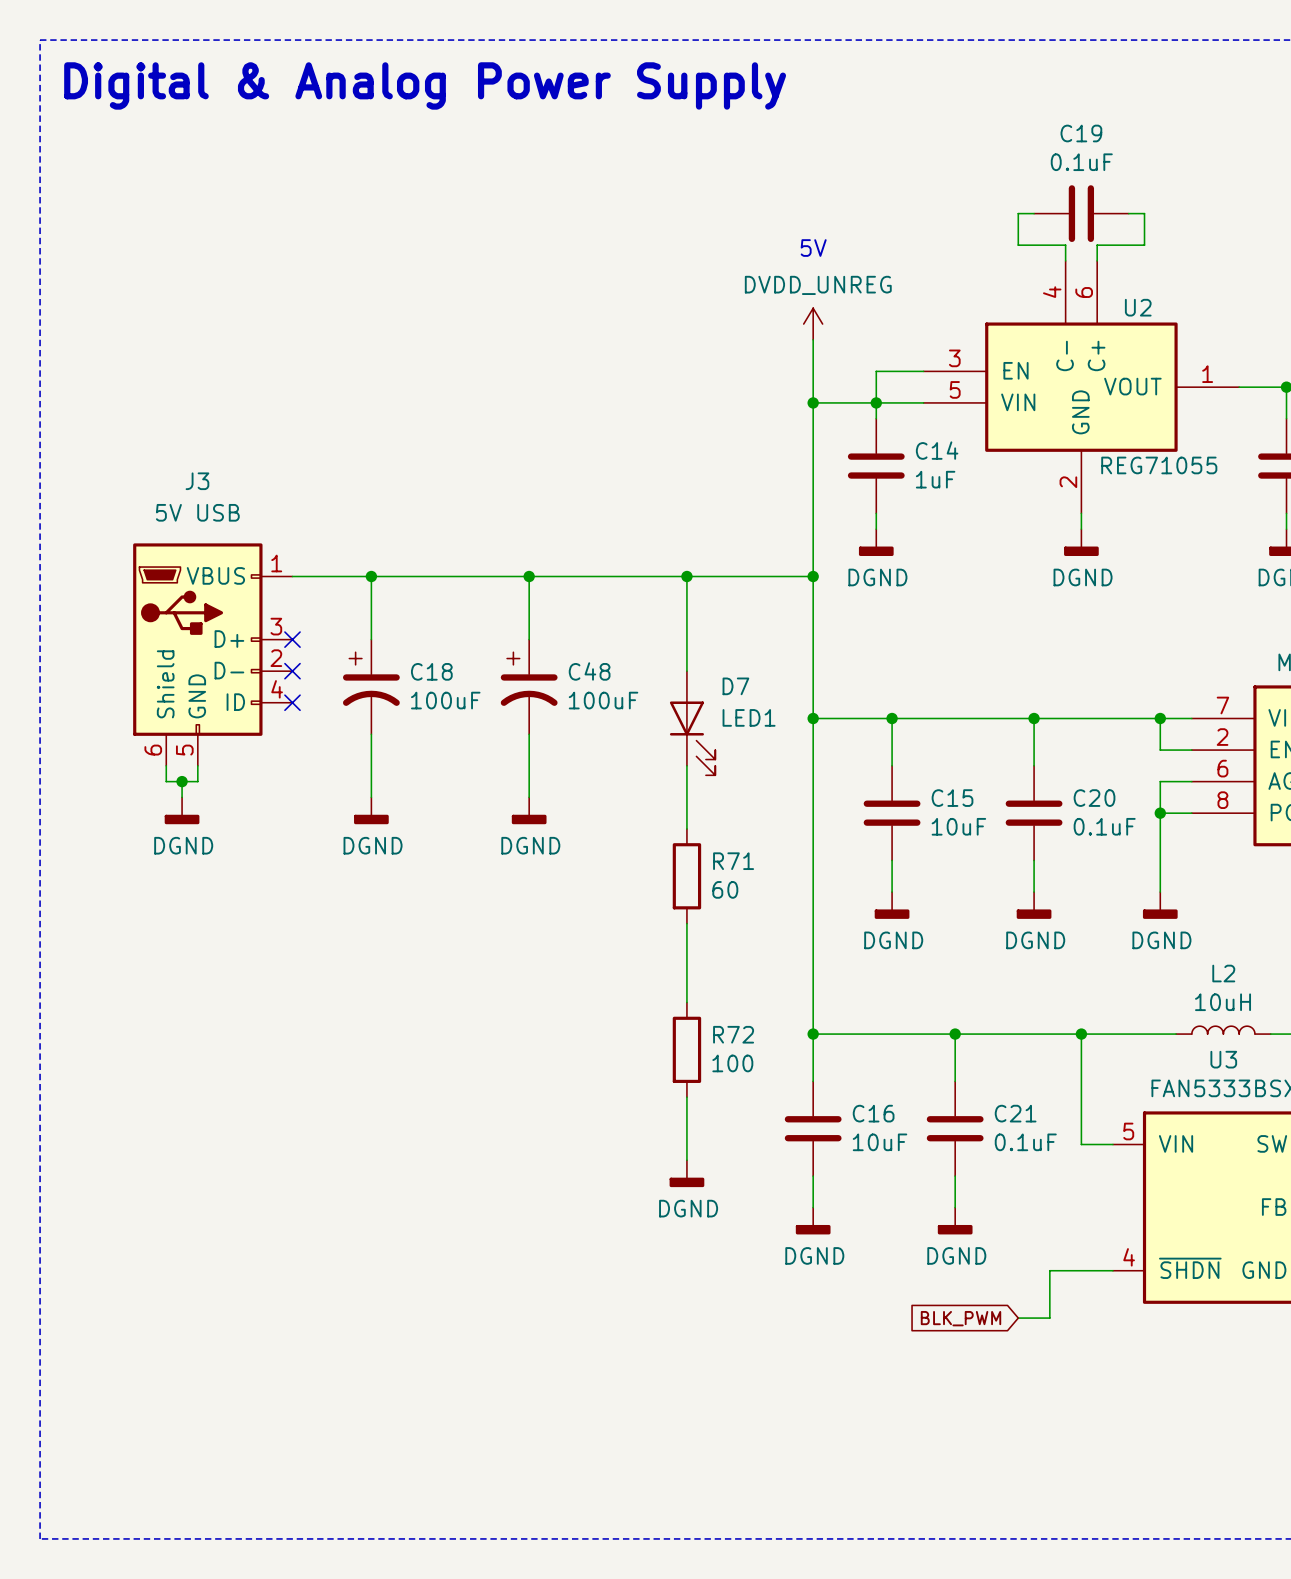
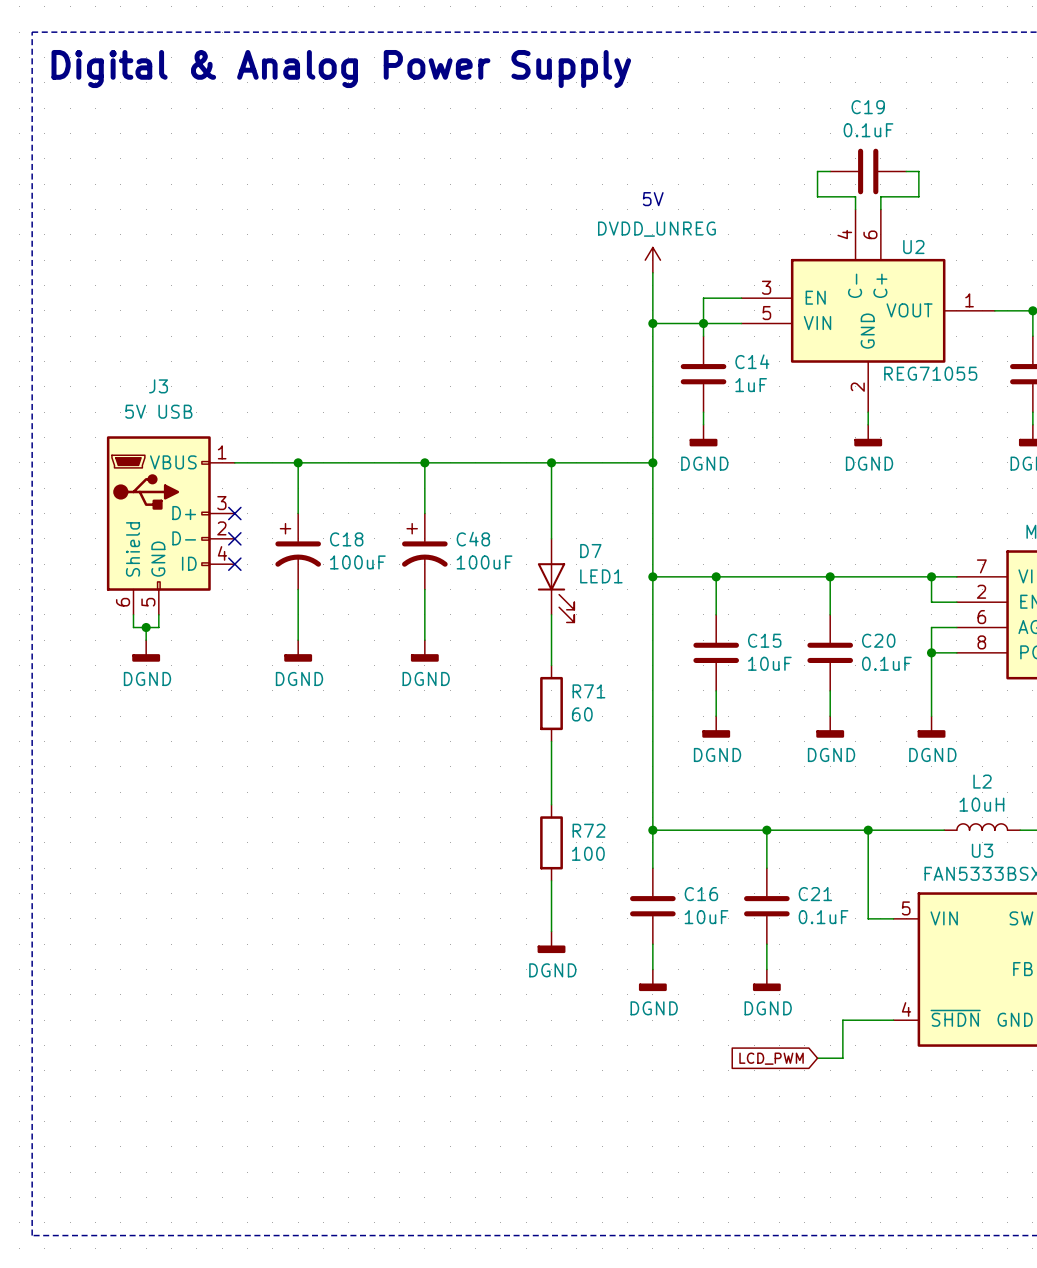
global label: BLK_PWM (961, 1318) -> LCD_PWM (771, 1058)

